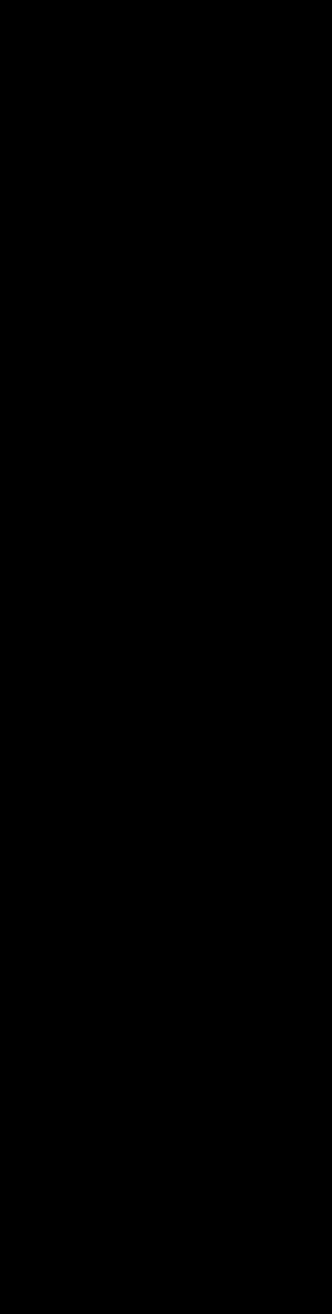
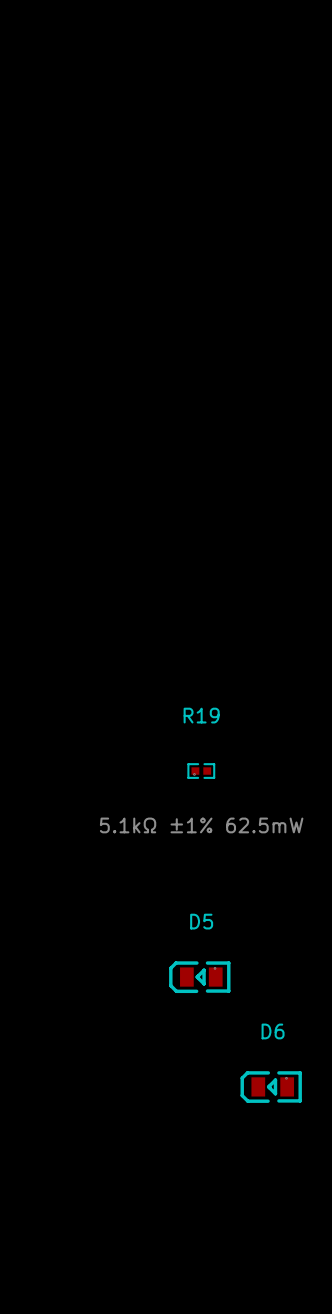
R19: none -> 5.1kΩ ±1% 62.5mW (201, 771)
D5: none -> (199, 977)
D6: none -> (271, 1087)

